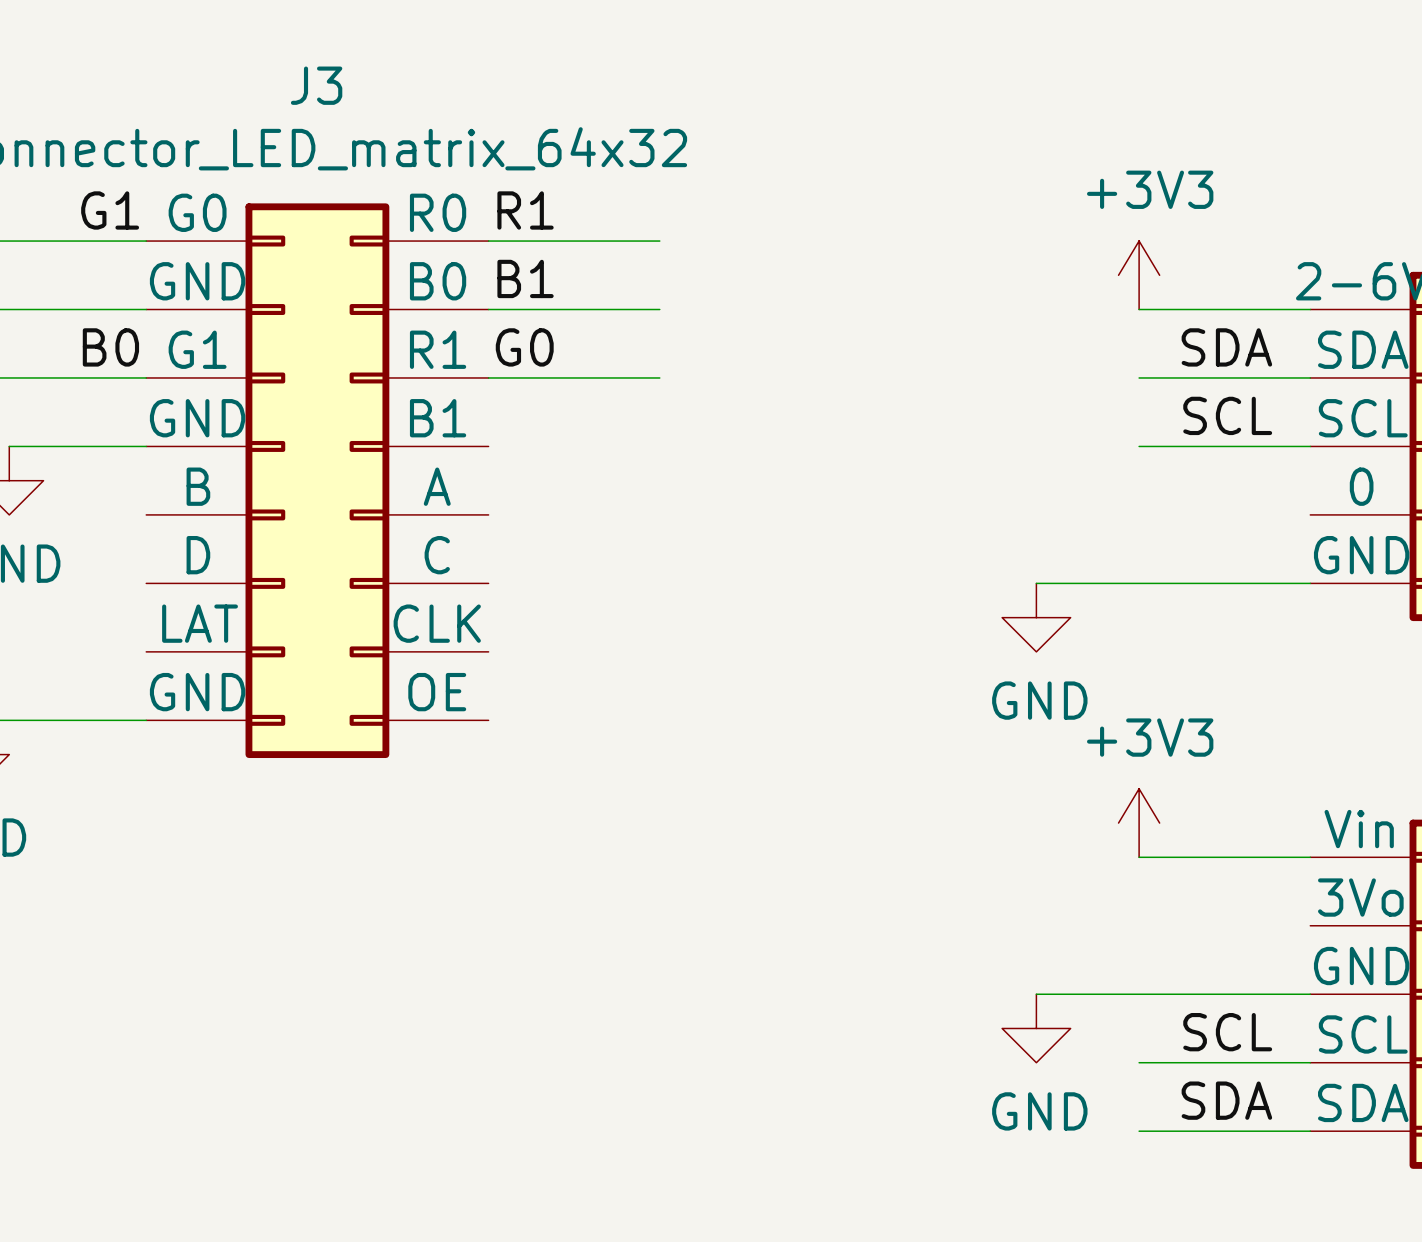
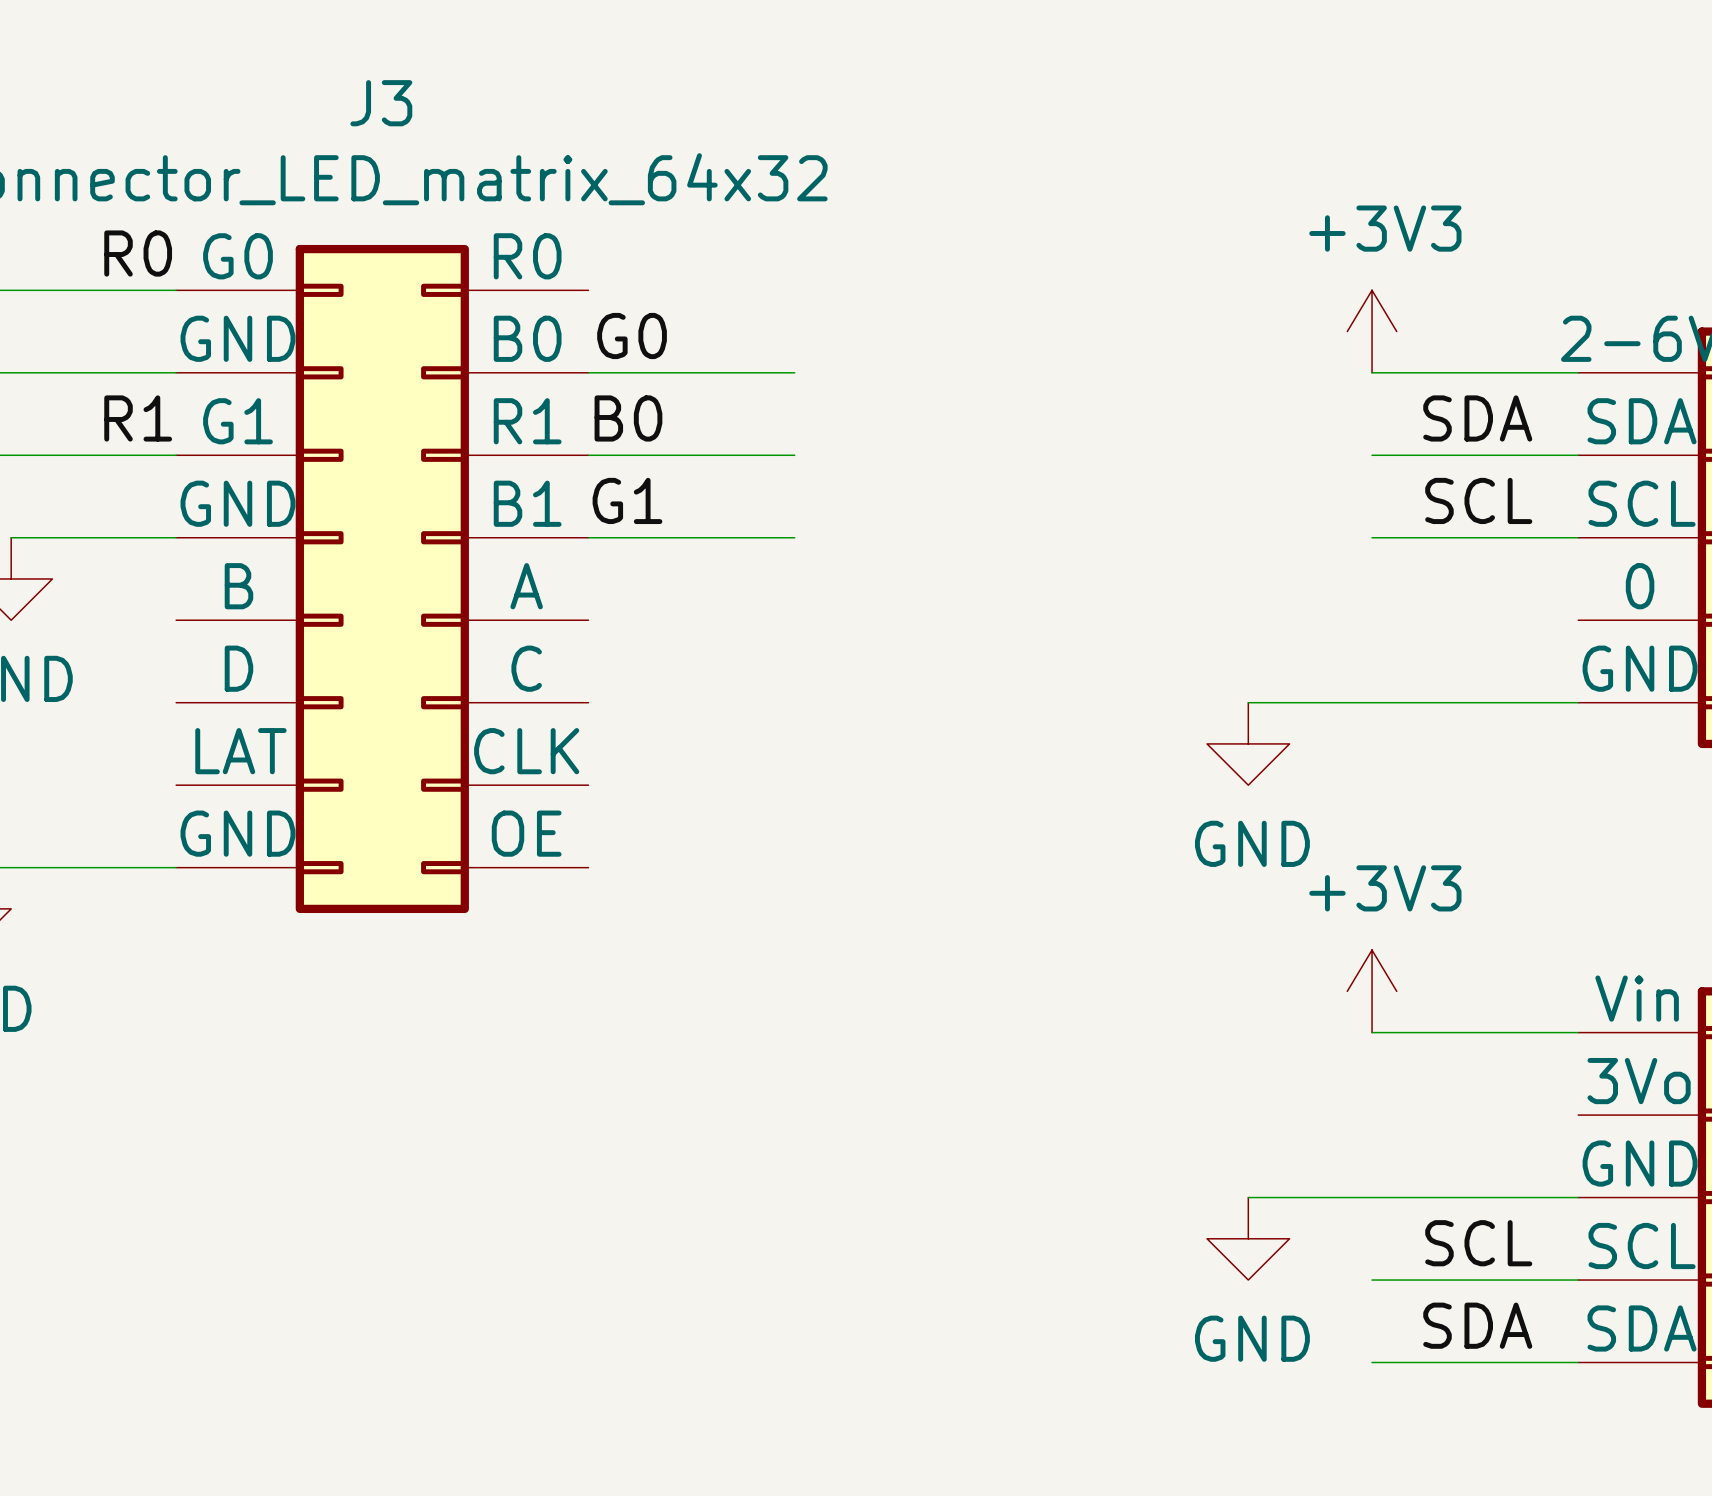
label position: G1 (110, 210) -> G1 (627, 500)
label: none -> R0 (138, 253)
label position: R1 (525, 210) -> R1 (138, 418)
wire: (488, 241) (659, 241) -> (588, 537) (794, 537)
label: B1 (525, 278) -> G0 (632, 336)
label position: B0 (110, 347) -> B0 (628, 418)
label: G0 (524, 347) -> none

